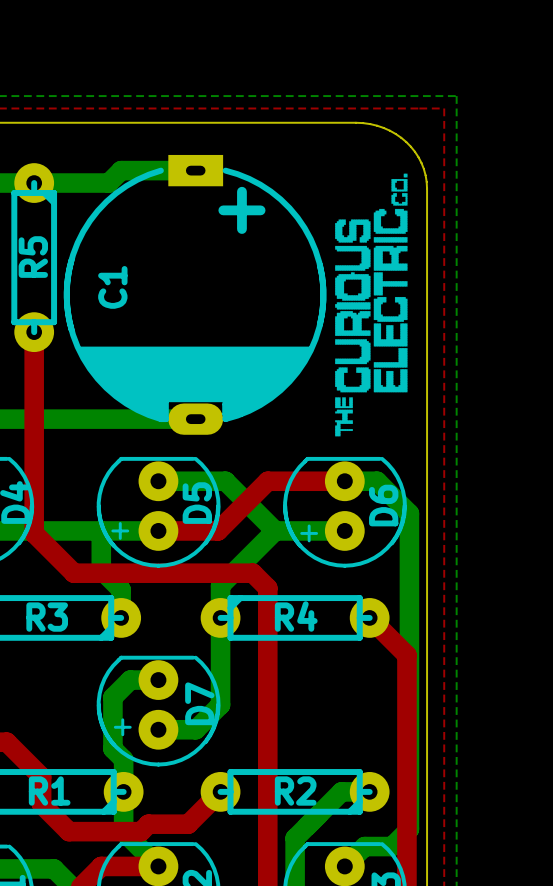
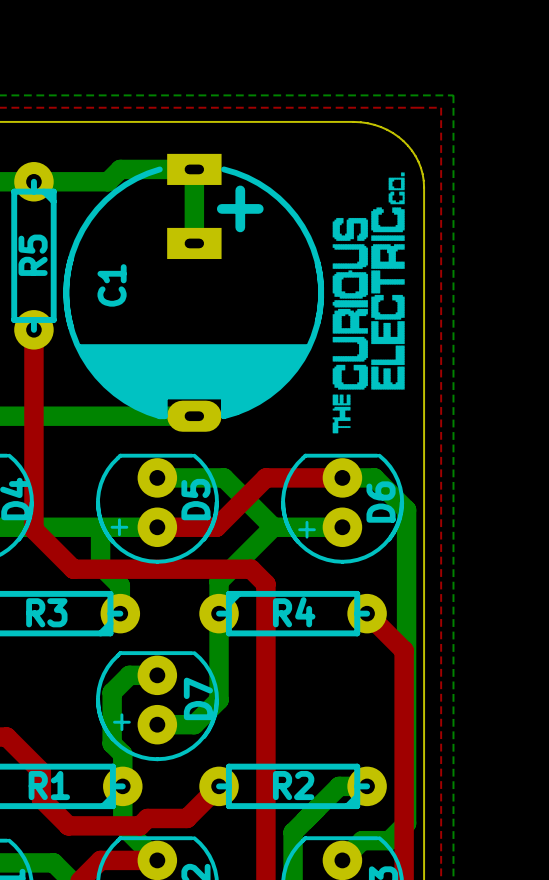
C1 footprint: [63, 154, 327, 435] -> [63, 153, 325, 432]
bottom track: none -> (194, 169) (194, 243)

